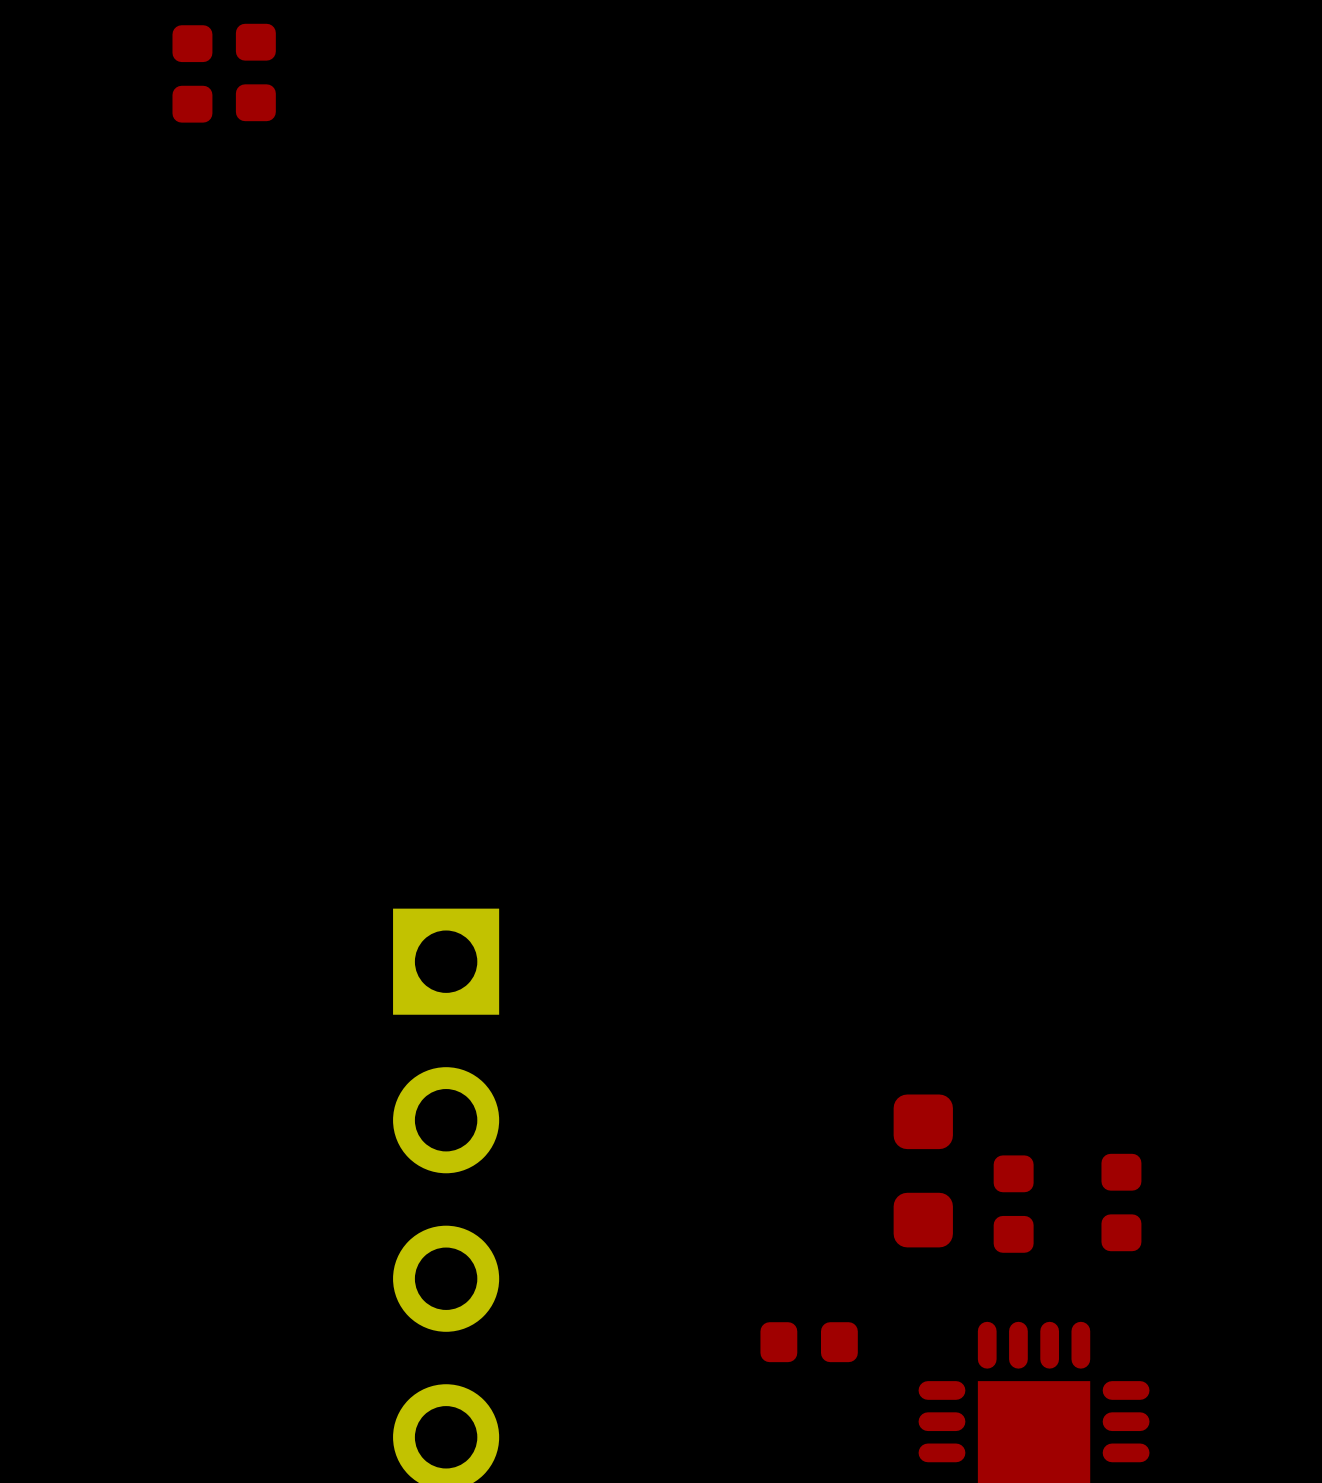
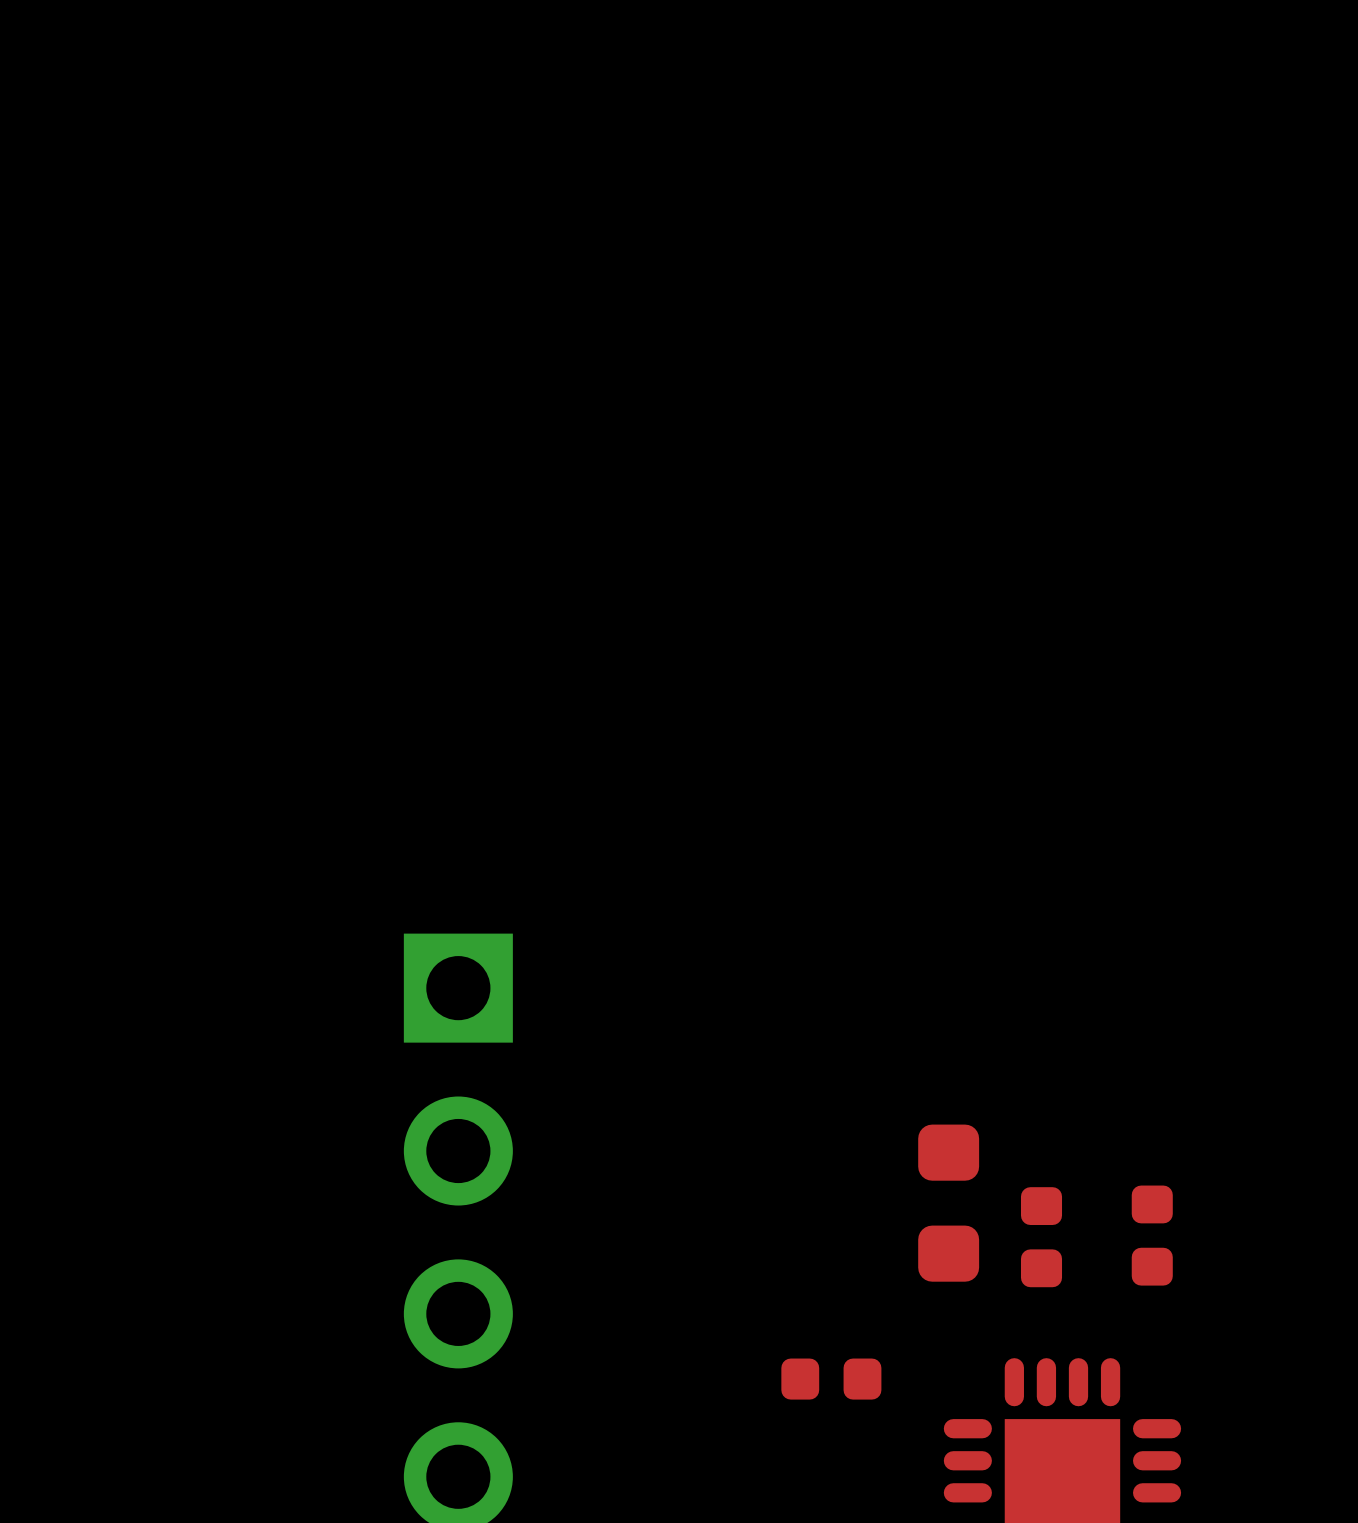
part: (255, 72) -> none
part: (192, 73) -> none

